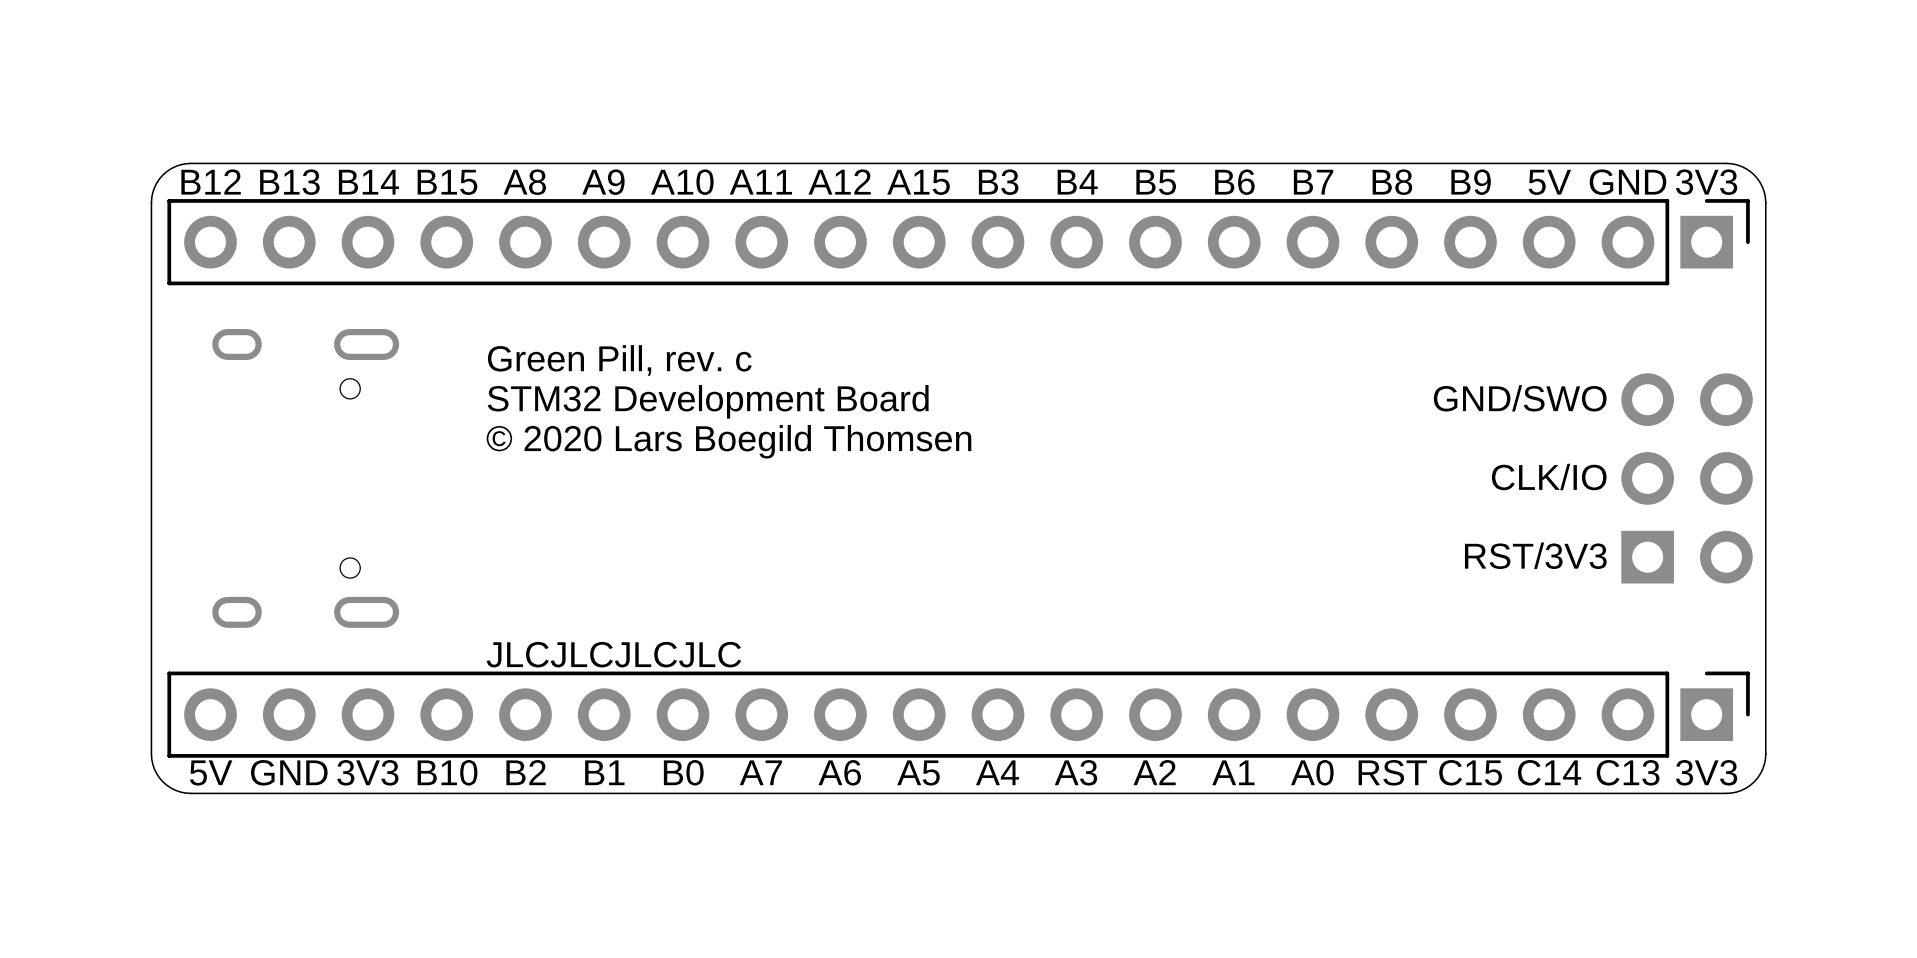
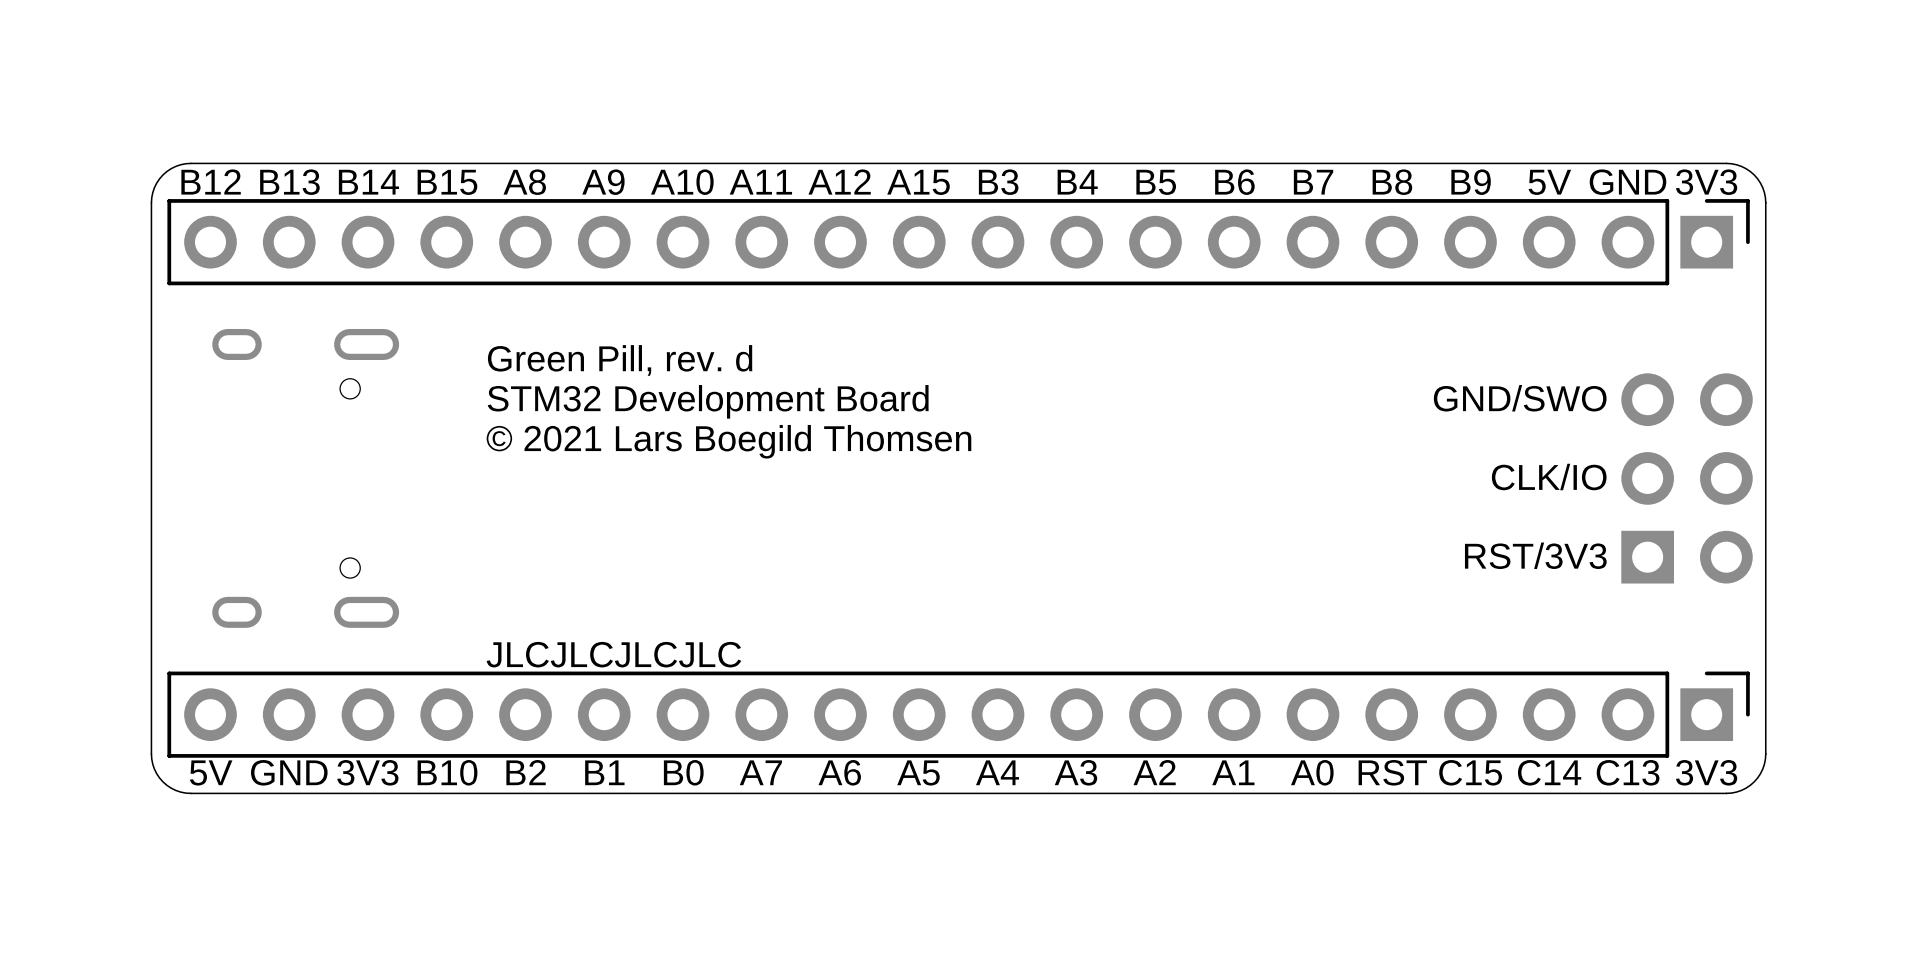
text: Green Pill, rev. c (619, 360) -> Green Pill, rev. d (620, 360)
text: © 2020 Lars Boegild Thomsen (728, 441) -> © 2021 Lars Boegild Thomsen (728, 441)

